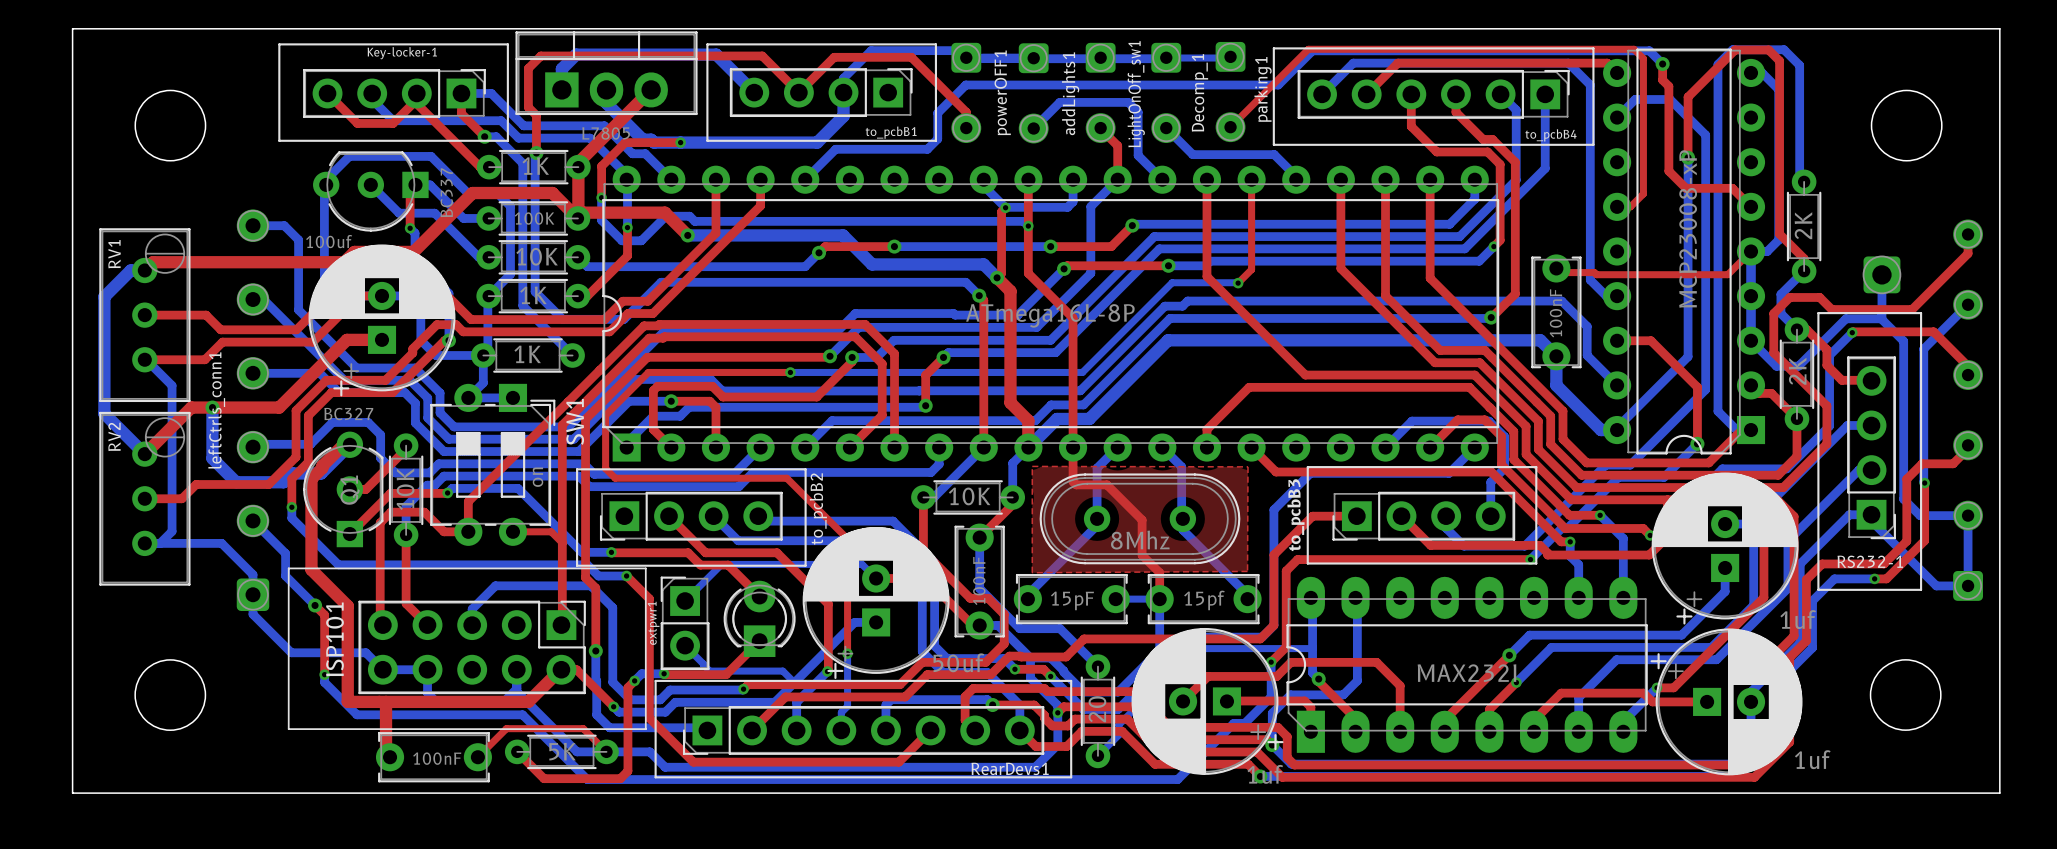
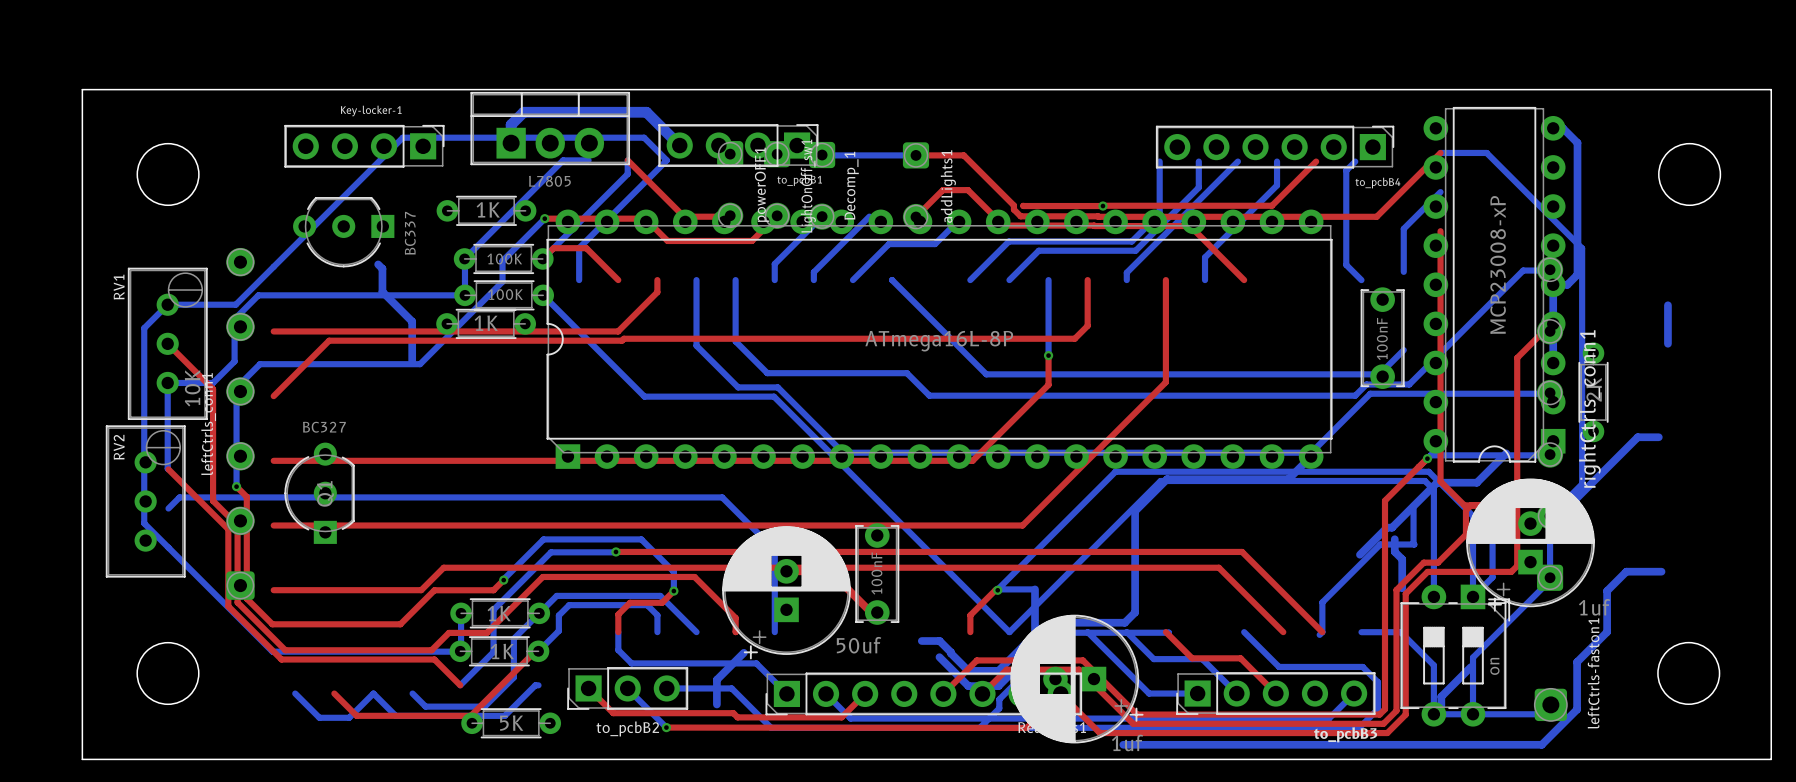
line: (279, 44) (507, 44) (507, 140) (279, 140) (279, 44) -> none
line: (707, 44) (935, 44) (935, 140) (707, 140) (707, 44) -> none
line: (1273, 48) (1593, 48) (1593, 144) (1273, 144) (1273, 48) -> none
bottom track: (1230, 56) (1166, 58) -> none
bottom track: (1166, 57) (966, 58) (959, 50) (871, 50) (843, 78) (843, 116) (817, 142) (654, 142) (651, 139) (642, 139) (606, 103) (606, 89) -> none
top track: (1662, 64) (1662, 80) (1668, 86) (1668, 171) (1686, 188) (1732, 188) (1751, 206) -> none
bottom track: (1662, 64) (1649, 50) (1312, 50) (1278, 85) (965, 85) (937, 113) (937, 139) (927, 149) (835, 149) (805, 179) -> none
via: (1662, 64) -> none
top track: (1617, 72) (1607, 63) (1397, 63) (1366, 94) -> none
top track: (651, 89) (578, 162) (578, 218) -> none
powerOFF1 position: (966, 92) -> (730, 184)
LightOnOff_sw1 position: (1100, 92) -> (777, 185)
Decomp_1 position: (1166, 92) -> (822, 185)
parking1: (1230, 92) -> none
top track: (327, 93) (357, 123) (393, 123) (416, 99) -> none
bottom track: (372, 93) (372, 99) (393, 120) (501, 120) (518, 138) (590, 138) (626, 174) (627, 227) -> none
top track: (416, 93) (416, 103) (480, 167) (489, 167) -> none
top track: (461, 93) (461, 113) (484, 136) -> none
bottom track: (461, 93) (491, 93) (523, 125) (604, 125) (632, 153) (645, 153) (671, 179) -> none
addLights1 position: (1033, 93) -> (915, 186)
bottom track: (1322, 94) (1353, 63) (1568, 63) (1590, 85) (1590, 280) (1606, 296) (1617, 296) -> none
top track: (1411, 94) (1411, 126) (1436, 151) (1487, 151) (1500, 164) (1500, 240) (1493, 246) -> none
top track: (1455, 94) (1455, 112) (1483, 139) (1492, 139) (1515, 162) (1515, 293) (1491, 317) -> none
bottom track: (1500, 94) (1516, 110) (1516, 180) (1459, 236) (1154, 236) (1050, 340) (893, 340) (876, 357) (852, 357) -> none
bottom track: (1545, 94) (1545, 168) (1464, 248) (1159, 248) (1055, 352) (948, 352) (943, 357) -> none
top track: none -> (1440, 152) (1376, 216) (1020, 216) (1013, 209) (1013, 205) (963, 155) (915, 155)
bottom track: none -> (1440, 152) (1486, 152) (1582, 248) (1582, 484) (1550, 516) (1550, 580) (1473, 657) (1473, 714)
bottom track: none -> (822, 155) (915, 155)
bottom track: none -> (588, 160) (563, 160) (464, 258) (464, 295) (258, 295) (234, 319) (234, 361) (213, 382) (167, 382) (168, 469)
top track: none -> (627, 160) (684, 216) (730, 215)
bottom track: none -> (627, 160) (627, 174) (542, 258)
bottom track: none -> (1159, 161) (1159, 213) (1131, 241) (1008, 241) (970, 280)
bottom track: none -> (1198, 161) (1198, 187) (1135, 250) (1038, 250) (1009, 280)
bottom track: none -> (1237, 161) (1126, 272) (1126, 280)
bottom track: none -> (1277, 161) (1277, 185) (1205, 257) (1205, 280)
top track: none -> (1316, 161) (1271, 205) (1023, 205)
bottom track: none -> (1355, 161) (1346, 170) (1346, 264) (1361, 280)
bottom track: (1617, 117) (1635, 99) (1670, 99) (1705, 135) (1705, 389) (1630, 465) (1605, 465) (1524, 546) (1463, 546) (1446, 528) (1446, 516) -> none
top track: (1230, 127) (1308, 49) (1634, 49) (1643, 58) (1643, 193) (1630, 206) (1617, 206) -> none
top track: (966, 128) (966, 112) (911, 57) (834, 57) (798, 92) (762, 55) (540, 55) (528, 68) (528, 107) (536, 115) (536, 153) -> none
bottom track: (1033, 128) (1059, 102) (1128, 102) (1138, 112) (1138, 155) (1162, 179) -> none
top track: (1100, 128) (1117, 145) (1117, 179) -> none
bottom track: (1166, 128) (1192, 154) (1274, 154) (1296, 176) (1296, 179) -> none
bottom track: (484, 136) (496, 136) (522, 163) (522, 305) (572, 355) -> none
via: (484, 136) -> none
top track: (680, 142) (625, 142) (601, 166) (601, 197) -> none
via: (680, 142) -> none
bottom track: none -> (1440, 192) (1403, 228) (1403, 271)
bottom track: (536, 153) (535, 291) (562, 319) (624, 319) (661, 282) (965, 282) (979, 295) -> none
via: (536, 153) -> none
top track: (1688, 157) (1688, 97) (1735, 49) (1768, 49) (1779, 60) (1779, 234) (1804, 258) (1804, 271) -> none
bottom track: (1688, 157) (1688, 356) (1617, 427) (1617, 430) (1601, 430) (1556, 385) (1556, 356) (1540, 340) (1168, 340) (1089, 418) (1056, 418) (1012, 463) (1012, 497) -> none
via: (1688, 157) -> none
via: none -> (1102, 206)
top track: none -> (777, 215) (752, 240) (667, 240) (645, 218) (544, 218)
bottom track: none -> (822, 216) (774, 263) (774, 280)
bottom track: none -> (869, 216) (813, 272) (813, 280)
top track: none -> (915, 217) (942, 190) (968, 190) (1003, 225) (1190, 226) (1244, 280)
bottom track: none -> (961, 217) (935, 244) (888, 244) (852, 280)
bottom track: none -> (544, 218) (502, 260) (502, 281) (420, 364) (260, 364) (236, 387) (236, 486)
top track: (715, 179) (715, 233) (647, 301) (622, 301) (604, 319) (471, 319) (417, 266) (360, 266) (296, 329) (220, 329) (206, 315) (144, 315) -> none
top track: (760, 179) (760, 205) (652, 313) (627, 313) (609, 331) (463, 331) (456, 324) (436, 324) (412, 348) (412, 353) (385, 380) (326, 380) (296, 410) (296, 457) (268, 484) (196, 484) (181, 498) (144, 498) -> none
bottom track: (983, 179) (983, 185) (1005, 207) (1067, 207) (1073, 201) (1073, 179) -> none
top track: (1028, 179) (1028, 273) (1073, 318) (1073, 481) (1076, 484) (1106, 484) (1142, 520) (1142, 555) (1159, 572) (1159, 599) -> none
bottom track: (1117, 179) (1090, 206) (1090, 273) (1036, 327) (858, 327) (830, 356) -> none
top track: (1206, 179) (1206, 276) (1305, 375) (1474, 375) (1526, 426) (1526, 454) (1571, 499) (1777, 499) (1794, 516) (1794, 635) (1777, 652) (1777, 737) (1749, 765) (1294, 765) (1287, 757) (1287, 736) (1277, 727) (1170, 727) (1134, 691) (1047, 691) (1044, 688) (973, 688) (965, 696) (965, 720) (975, 730) -> none
top track: (1251, 179) (1251, 269) (1238, 283) -> none
top track: (1340, 179) (1340, 268) (1435, 362) (1479, 362) (1538, 421) (1538, 449) (1576, 487) (1783, 487) (1826, 443) (1826, 405) (1773, 352) (1773, 313) (1789, 297) (1819, 297) (1831, 309) (1912, 309) (1968, 253) (1968, 234) -> none
top track: (1385, 179) (1385, 295) (1440, 350) (1484, 350) (1550, 416) (1550, 444) (1581, 475) (1778, 475) (1796, 456) (1796, 418) (1771, 393) (1759, 393) (1751, 385) -> none
top track: (1430, 179) (1430, 278) (1562, 411) (1562, 439) (1586, 462) (1708, 462) (1741, 430) (1751, 430) -> none
bottom track: (1474, 179) (1474, 199) (1449, 224) (1132, 225) -> none
bottom track: (1804, 181) (1799, 177) (1799, 65) (1784, 49) (1732, 49) (1717, 64) (1717, 411) (1736, 430) (1751, 430) -> none
bottom track: (370, 184) (399, 213) (434, 213) (478, 257) (488, 257) -> none
top track: (415, 184) (410, 190) (410, 228) -> none
bottom track: (415, 184) (430, 184) (463, 218) (488, 218) -> none
top track: none -> (1440, 231) (1440, 481) (1464, 505) (1491, 505)
bottom track: (601, 197) (601, 220) (622, 240) (641, 240) (665, 216) (689, 216) (694, 221) (1023, 221) (1028, 226) -> none
via position: (601, 197) -> (544, 218)
top track: (1005, 207) (1001, 211) (1001, 273) (997, 277) (1010, 291) (1010, 402) (1028, 420) (1028, 447) -> none
via: (1005, 207) -> none
part position: (533, 218) -> (503, 258)
top track: none -> (542, 258) (553, 248) (586, 248) (618, 280)
bottom track: (253, 225) (284, 225) (298, 239) (298, 310) (356, 368) (415, 368) (440, 393) (440, 412) (454, 426) (568, 426) (663, 332) (836, 332) (855, 313) (1017, 315) (1064, 268) -> none
top track: (1132, 225) (1111, 246) (1050, 246) -> none
via: (1132, 225) -> none
via: (1028, 226) -> none
part: 2K (1804, 226) -> none
top track: (627, 227) (627, 255) (587, 296) (577, 296) -> none
via: (627, 227) -> none
via: (410, 228) -> none
bottom track: none -> (1550, 269) (1523, 270) (1409, 384) (1366, 384) (1355, 395) (929, 395) (906, 373) (767, 373) (735, 341) (735, 280)
top track: (687, 235) (665, 212) (583, 212) (577, 218) (552, 193) (472, 193) (413, 251) (354, 251) (344, 262) (153, 262) (144, 270) -> none
bottom track: (687, 235) (843, 235) (872, 264) (983, 264) (997, 277) -> none
via: (687, 235) -> none
bottom track: none -> (579, 280) (579, 248) (666, 160) (644, 137) (402, 137) (235, 304) (167, 304) (144, 328) (144, 523) (272, 651) (459, 651) (461, 613)
top track: none -> (657, 280) (657, 292) (618, 331) (273, 331)
bottom track: none -> (696, 280) (696, 345) (738, 387) (777, 387) (843, 452) (1311, 452) (1370, 393) (1550, 392)
top track: (894, 246) (825, 246) (818, 252) -> none
bottom track: (894, 246) (1050, 246) -> none
via: (894, 246) -> none
bottom track: none -> (892, 280) (986, 374) (1379, 374) (1403, 350)
via: (1050, 246) -> none
bottom track: none -> (1048, 280) (1048, 355)
top track: none -> (1087, 280) (1087, 325) (1074, 338) (329, 340) (273, 396)
top track: none -> (1165, 280) (1165, 382) (1022, 525) (273, 525)
bottom track: (1493, 246) (1479, 261) (1210, 261) (1205, 265) (1168, 265) -> none
via: (1493, 246) -> none
top track: (1751, 251) (1727, 274) (1596, 274) (1594, 272) (1560, 272) (1556, 268) -> none
bottom track: (818, 252) (805, 266) (587, 266) (577, 257) -> none
via: (818, 252) -> none
part: 10K (533, 257) -> none
part: none -> 100K (504, 295)
bottom track: none -> (543, 295) (644, 396) (774, 396) (1009, 632) (1160, 480) (1424, 480) (1433, 489) (1433, 596)
top track: (1168, 265) (1067, 265) (1064, 268) -> none
via: (1168, 265) -> none
via: (1064, 268) -> none
bottom track: (144, 270) (130, 270) (104, 296) (104, 413) (144, 454) -> none
bottom track: (1804, 271) (1780, 294) (1780, 313) (1796, 329) -> none
part: (1881, 274) -> none
via: (997, 277) -> none
bottom track: (1238, 283) (1172, 282) (1082, 372) (790, 372) -> none
via: (1238, 283) -> none
top track: (382, 295) (358, 295) (312, 342) (222, 342) (204, 359) (144, 359) -> none
top track: (979, 295) (983, 300) (983, 447) -> none
via: (979, 295) -> none
bottom track: (253, 299) (263, 299) (344, 380) (409, 380) (427, 398) (427, 417) (449, 439) (573, 439) (633, 379) (710, 379) (722, 390) (919, 390) -> none
top track: none -> (1550, 331) (1542, 332) (1517, 357) (1517, 566) (1511, 571) (1427, 571) (1405, 593) (1405, 714) (1387, 733) (1099, 733) (1060, 693) (1026, 727) (666, 727)
bottom track: (1968, 304) (1923, 349) (1924, 483) -> none
line: (1818, 313) (1921, 313) (1921, 589) (1818, 589) (1818, 313) -> none
RV1 position: (144, 315) -> (167, 343)
bottom track: (1491, 317) (1170, 318) (1083, 404) (1051, 404) (1035, 420) (832, 420) (805, 447) -> none
via: (1491, 317) -> none
top track: none -> (167, 343) (213, 389) (213, 500) (237, 525) (237, 602) (285, 650) (431, 650) (448, 632) (486, 632) (542, 576) (694, 576) (735, 618) (735, 632)
part: 100uf (382, 320) -> none
top track: (1796, 329) (1806, 329) (1826, 349) (1826, 365) (1841, 380) (1871, 380) -> none
top track: none -> (1048, 355) (1048, 384) (972, 460) (273, 460)
via: none -> (1048, 355)
top track: (1852, 332) (1933, 331) (1968, 366) (1968, 375) -> none
bottom track: (1852, 332) (1829, 355) (1829, 426) (1786, 468) (1722, 468) (1696, 495) (1696, 521) (1682, 535) (1650, 535) -> none
via: (1852, 332) -> none
top track: (382, 339) (346, 339) (279, 407) (191, 407) (144, 454) -> none
top track: (448, 340) (444, 340) (392, 392) (331, 392) (308, 415) (308, 462) (291, 478) (291, 507) -> none
via: (448, 340) -> none
top track: (1617, 340) (1651, 340) (1697, 387) (1697, 443) -> none
bottom track: (1750, 341) (1776, 366) (1798, 366) (1845, 318) (1881, 318) (1903, 341) (1903, 499) (1920, 515) (1968, 515) (1968, 585) (1936, 585) (1871, 521) (1871, 514) (1849, 514) (1800, 563) (1800, 642) (1751, 691) (1751, 744) (1731, 764) (1291, 764) (1272, 745) (1272, 713) (1290, 694) (1343, 694) (1357, 680) (1357, 599) (1355, 597) -> none
bottom track: (483, 355) (487, 350) (487, 296) (510, 274) (510, 206) (496, 192) (467, 192) (431, 156) (349, 156) (326, 179) (324, 186) (324, 278) (341, 295) (410, 295) (420, 305) (420, 340) (436, 355) (483, 355) -> none
bottom track: (483, 355) (483, 382) (468, 397) (512, 397) -> none
part: 1K (527, 355) -> none
top track: (830, 356) (647, 357) (585, 419) (585, 577) (595, 588) (595, 650) -> none
via: (830, 356) -> none
top track: (852, 357) (852, 361) (816, 397) (723, 397) (712, 386) (657, 386) (653, 390) (653, 429) (671, 447) -> none
via: (852, 357) -> none
top track: (943, 357) (925, 375) (925, 405) -> none
via: (943, 357) -> none
bottom track: (144, 359) (172, 385) (172, 531) (160, 543) -> none
RV1 value: none -> 10K (192, 388)
top track: (790, 372) (648, 372) (605, 415) (605, 468) (615, 478) (786, 478) (847, 538) (847, 653) -> none
via: (790, 372) -> none
bottom track: (253, 373) (319, 373) (339, 392) (404, 392) (415, 403) (415, 423) (443, 451) (578, 451) (629, 401) (671, 401) -> none
bottom track: (1617, 385) (1587, 355) (1587, 326) (1561, 301) (1187, 301) (1182, 306) (1164, 306) (1080, 390) (919, 390) -> none
top track: (671, 401) (709, 401) (715, 407) (715, 447) -> none
via: (671, 401) -> none
bottom track: (925, 405) (924, 407) (689, 407) (680, 416) (653, 416) (626, 442) (626, 447) -> none
via: (925, 405) -> none
bottom track: (212, 407) (212, 458) (236, 482) (283, 482) (292, 473) (321, 473) (349, 444) -> none
via: (212, 407) -> none
top track: (1489, 407) (1469, 387) (1249, 387) (1206, 429) (1206, 447) (1214, 447) -> none
top track: (1489, 407) (1513, 431) (1513, 459) (1569, 515) (1600, 515) -> none
rightCtrls_conn1: none -> (1550, 423)
part: (1968, 410) -> none
via: (1697, 443) -> none
top track: (349, 444) (343, 444) (311, 478) (311, 569) (347, 606) (347, 701) (528, 701) (560, 669) (576, 669) (613, 706) -> none
top track: (406, 445) (406, 449) (365, 489) (349, 489) -> none
bottom track: none -> (1550, 454) (1430, 455) (1427, 458)
bottom track: (253, 447) (255, 444) (310, 444) (332, 422) (368, 422) (380, 434) (380, 458) (395, 472) (429, 472) (438, 463) (583, 463) (594, 474) (733, 474) (760, 447) -> none
top track: (849, 447) (882, 415) (882, 363) (855, 336) (649, 338) (562, 425) (561, 625) -> none
top track: (894, 447) (894, 353) (865, 324) (644, 325) (468, 501) (468, 531) (444, 531) (424, 512) (390, 512) (380, 522) (380, 622) (382, 625) -> none
bottom track: (939, 447) (939, 464) (931, 472) (753, 472) (738, 486) (589, 486) (578, 476) (443, 476) (434, 485) (427, 485) (406, 506) (406, 534) -> none
bottom track: (983, 447) (933, 497) (923, 497) -> none
bottom track: (1117, 447) (1097, 468) (1097, 525) (1027, 594) (1027, 599) -> none
bottom track: (1162, 447) (1181, 466) (1182, 530) (1247, 594) (1247, 599) -> none
top track: (1251, 447) (1276, 472) (1491, 472) (1561, 541) (1570, 541) -> none
bottom track: (1385, 447) (1411, 421) (1488, 421) (1504, 436) (1504, 468) (1490, 482) (1490, 516) -> none
top track: (1430, 447) (1457, 419) (1484, 419) (1501, 436) (1501, 464) (1565, 528) (1643, 528) (1650, 535) -> none
RS232-1: (1871, 447) -> none
via: none -> (1427, 458)
top track: (1966, 450) (1953, 463) (1922, 463) (1906, 479) (1906, 541) (1884, 563) (1822, 563) (1806, 579) (1806, 640) (1789, 657) (1789, 742) (1754, 777) (1282, 777) (1257, 752) (1160, 752) (1127, 719) (1074, 719) (1068, 725) (1052, 725) (1034, 705) (992, 705) -> none
top track: none -> (1418, 467) (1419, 467) (1427, 458) (1427, 458) (1385, 500) (1385, 709) (1379, 714) (1137, 714) (1082, 660) (976, 660) (943, 693)
top track: none -> (168, 469) (228, 529) (228, 606) (281, 659) (434, 659) (460, 685)
SW1: (492, 464) -> none
top zone outline: (1032, 466) (1247, 466) (1247, 571) (1032, 572) (1032, 466) -> none
line: (1307, 467) (1536, 467) (1536, 563) (1307, 563) (1307, 467) -> none
line: (577, 469) (805, 469) (805, 565) (577, 565) (577, 469) -> none
bottom track: (1871, 470) (1858, 470) (1787, 541) (1787, 588) (1716, 659) (1616, 659) (1578, 697) (1578, 731) -> none
top track: none -> (236, 486) (246, 496) (246, 598) (272, 624) (400, 624) (434, 590) (493, 590) (503, 580)
top track: (1924, 483) (1924, 540) (1886, 578) (1874, 578) -> none
via: (1924, 483) -> none
part: 10K (406, 490) -> none
to_pcbB2 footprint: [599, 491, 783, 541] -> [567, 667, 689, 710]
to_pcbB3 footprint: [1332, 491, 1516, 541] -> [1176, 672, 1376, 715]
top track: (447, 492) (390, 493) (349, 534) -> none
bottom track: (447, 492) (452, 488) (518, 488) (581, 552) (611, 552) -> none
via: (447, 492) -> none
top track: (923, 497) (923, 551) (970, 598) (988, 598) (1004, 614) (1004, 643) (985, 662) (922, 662) (900, 684) (748, 684) (743, 689) -> none
part: 10K (968, 497) -> none
top track: (1012, 497) (1012, 504) (979, 537) -> none
top track: (1667, 499) (1667, 536) (1649, 555) (1547, 555) (1539, 545) (1430, 545) (1401, 516) -> none
bottom track: none -> (1413, 505) (1414, 544) (1380, 544) (1322, 602) (1322, 632) (1319, 634)
top track: none -> (1471, 505) (1465, 510) (1465, 534) (1438, 562) (1423, 562) (1396, 589) (1396, 710) (1383, 723) (1133, 723) (1079, 669) (1006, 669) (982, 693)
bottom track: none -> (168, 508) (179, 497) (722, 497) (774, 549) (774, 632)
bottom track: (291, 507) (291, 518) (338, 564) (587, 564) (598, 576) (626, 576) -> none
via position: (291, 507) -> (236, 486)
to_pcbB2 name position: to_pcbB2 (818, 508) -> to_pcbB2 (627, 728)
to_pcbB3 name position: to_pcbB3 (1295, 515) -> to_pcbB3 (1345, 734)
bottom track: (1600, 515) (1623, 538) (1623, 597) -> none
via: (1600, 515) -> none
top track: (669, 516) (705, 552) (777, 552) (828, 604) (827, 671) -> none
bottom track: (713, 516) (738, 540) (895, 540) (922, 567) (922, 651) (943, 672) (987, 672) (1019, 705) (1019, 730) -> none
bottom track: (758, 516) (763, 521) (893, 521) (934, 562) (934, 646) (947, 658) (1004, 658) (1014, 669) -> none
top track: (1356, 516) (1312, 516) (1273, 554) (1273, 625) (1260, 638) (1084, 638) (1066, 656) (1009, 656) (990, 674) (927, 674) (905, 696) (785, 696) (752, 730) -> none
part: 8Mhz (1139, 518) -> none
top track: (1762, 519) (1763, 521) (1763, 597) (1673, 687) (1657, 687) -> none
bottom track: (253, 520) (285, 553) (285, 576) (315, 605) -> none
bottom track: (1725, 524) (1745, 524) (1753, 532) (1753, 605) (1711, 647) (1551, 647) (1516, 682) -> none
top track: (512, 531) (551, 531) (562, 542) -> none
top track: (406, 534) (406, 603) (427, 625) -> none
via: (1650, 535) -> none
bottom track: (979, 537) (979, 588) (1019, 628) (1060, 628) (1097, 666) -> none
via: (1570, 541) -> none
bottom track: (144, 543) (221, 543) (253, 574) (253, 614) (291, 652) (365, 652) (382, 669) (427, 669) (427, 693) (434, 700) (505, 700) (516, 688) -> none
bottom track: none -> (1492, 544) (1492, 577) (1473, 596) (1473, 515) (1428, 471) (1115, 471) (997, 589)
top track: (611, 552) (688, 552) (700, 565) (728, 565) (759, 596) -> none
via: (611, 552) -> none
top track: none -> (615, 551) (1242, 551) (1322, 632)
bottom track: none -> (615, 551) (551, 552) (493, 609) (493, 652) (460, 685)
via: none -> (615, 551)
top track: (1530, 559) (1297, 559) (1286, 570) (1286, 647) (1271, 662) -> none
via: (1530, 559) -> none
bottom track: (1725, 567) (1725, 591) (1681, 635) (1529, 635) (1509, 655) -> none
line: (288, 568) (645, 568) (645, 729) (288, 729) (288, 568) -> none
top track: (626, 576) (649, 598) (649, 718) (693, 762) (898, 762) (930, 730) -> none
via: (626, 576) -> none
bottom track: (876, 578) (862, 564) (721, 564) (685, 601) -> none
via: (1874, 578) -> none
bottom track: none -> (503, 580) (543, 539) (641, 539) (673, 571) (673, 591)
via: none -> (503, 580)
bottom track: (1310, 597) (1312, 599) (1312, 672) (1318, 679) -> none
part: 15pF (1071, 599) -> none
part: 15pf (1203, 599) -> none
top track: none -> (273, 590) (421, 590) (443, 567) (1218, 567) (1283, 632)
top track: none -> (997, 590) (995, 590) (970, 615) (970, 632)
via: none -> (997, 590)
top track: none -> (673, 591) (662, 602) (630, 602) (618, 614) (618, 632)
via: none -> (673, 591)
top track: (315, 605) (324, 615) (324, 674) -> none
via: (315, 605) -> none
part: (759, 618) -> none
bottom track: (876, 622) (854, 622) (774, 702) (675, 702) (665, 712) (619, 712) (613, 706) -> none
extpwr1: (685, 623) -> none
bottom track: (472, 625) (472, 609) (495, 585) (590, 585) (612, 607) (612, 682) (630, 699) (660, 699) (670, 690) (743, 689) -> none
bottom track: (979, 625) (997, 625) (1030, 658) (1030, 678) (1057, 705) (1057, 744) (1035, 767) (665, 767) (649, 751) (577, 751) (516, 691) (516, 669) (514, 672) -> none
part: none -> 1K (500, 613)
top track: (759, 641) (726, 674) (664, 673) -> none
bottom track: (685, 645) (709, 671) (782, 671) (794, 682) -> none
ISP101: (472, 647) -> none
bottom track: none -> (618, 632) (618, 650) (631, 663) (756, 663) (786, 693)
bottom track: none -> (657, 632) (657, 615) (647, 605) (569, 605) (558, 615) (558, 630) (538, 651)
bottom track: none -> (696, 632) (660, 595) (556, 595) (513, 638) (513, 677) (484, 706) (425, 706) (412, 693)
bottom track: none -> (1087, 632) (1149, 693) (1197, 693)
bottom track: none -> (1126, 632) (1153, 659) (1202, 659) (1236, 693)
top track: none -> (1165, 632) (1192, 658) (1240, 658) (1275, 693)
bottom track: none -> (1244, 632) (1278, 666) (1362, 666) (1377, 682) (1377, 709) (1359, 727) (771, 727) (731, 688) (666, 688)
bottom track: none -> (1361, 632) (1400, 632) (1433, 665) (1433, 714) (1541, 714) (1550, 704)
bottom track: (595, 650) (596, 714) (609, 727) (704, 727) (707, 730) -> none
via: (595, 650) -> none
bottom track: (847, 653) (847, 706) (841, 712) (841, 730) -> none
via: (847, 653) -> none
top track: (1509, 655) (1444, 719) (1444, 731) -> none
via: (1509, 655) -> none
bottom track: (1271, 662) (1271, 696) (1244, 723) (1233, 723) (1177, 779) (587, 779) (522, 714) (357, 714) (324, 682) (324, 674) -> none
via: (1271, 662) -> none
part: MAX232I (1467, 664) -> none
part: none -> 1K (499, 651)
top track: none -> (538, 651) (535, 651) (470, 715) (356, 715) (334, 693)
top track: (1014, 669) (1043, 669) (1050, 676) -> none
via: (1014, 669) -> none
via: (827, 671) -> none
bottom track: (664, 673) (641, 673) (634, 680) -> none
via: (664, 673) -> none
via: (324, 674) -> none
part: none -> (1455, 655)
via: (1050, 676) -> none
top track: (1318, 679) (1318, 681) (1355, 718) (1355, 731) -> none
via: (1318, 679) -> none
top track: (634, 680) (627, 687) (627, 771) (620, 778) (544, 778) (517, 751) -> none
via: (634, 680) -> none
line: (655, 680) (1071, 680) (1071, 777) (655, 777) (655, 680) -> none
top track: (1516, 682) (1489, 709) (1489, 731) -> none
via: (1516, 682) -> none
via: (1657, 687) -> none
via: (743, 689) -> none
top track: (386, 701) (386, 753) (390, 757) -> none
top track: (1183, 701) (1208, 676) (1276, 676) (1290, 662) (1376, 662) (1400, 685) (1400, 731) -> none
top track: (1226, 701) (1304, 700) (1310, 707) (1310, 731) -> none
top track: (1707, 701) (1652, 701) (1643, 693) (1561, 693) (1534, 720) (1534, 731) -> none
part: 1uf (1726, 701) -> none
bottom track: (992, 705) (987, 699) (891, 699) (885, 705) (885, 730) -> none
via: (992, 705) -> none
via: (613, 706) -> none
bottom track: none -> (538, 685) (535, 685) (504, 715) (395, 715) (373, 693) (349, 717) (319, 717) (295, 693)
part: 20 (1097, 711) -> none
top track: none -> (588, 688) (613, 713) (733, 713) (737, 717) (841, 717) (865, 693)
bottom track: none -> (627, 688) (666, 727)
top track: (1057, 712) (1063, 706) (1132, 706) (1165, 739) (1266, 739) (1272, 745) -> none
via: (1057, 712) -> none
bottom track: none -> (1354, 693) (1329, 718) (850, 718) (826, 693)
RearDevs1 position: (863, 730) -> (923, 693)
top track: (1019, 730) (1035, 746) (1066, 746) (1081, 731) (1122, 731) (1155, 764) (1248, 764) (1260, 776) -> none
leftCtrls-faston1: none -> (1550, 704)
via: (1272, 745) -> none
top track: (606, 751) (583, 728) (506, 728) (477, 757) -> none
via: none -> (666, 727)
part: 100nF (433, 757) -> none
via: (1260, 776) -> none

